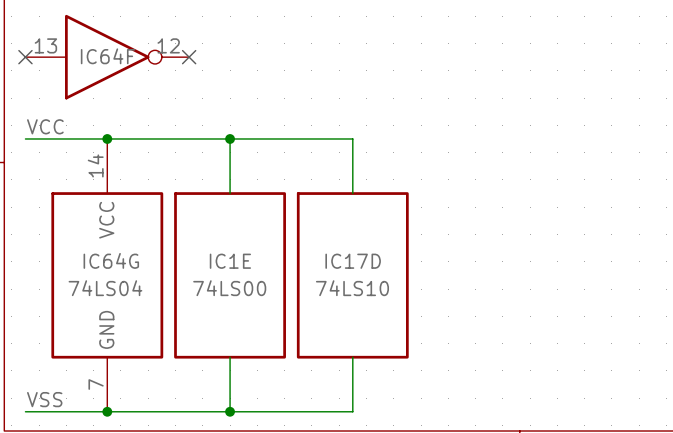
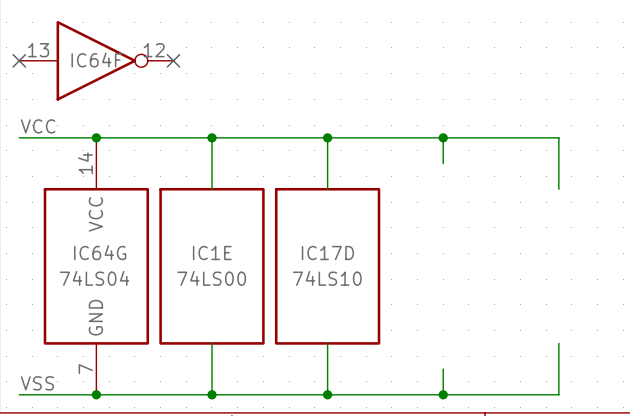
wire: none -> (327, 137) (558, 137) (558, 189)
junction: none -> (327, 137)
wire: none -> (443, 137) (443, 163)
junction: none -> (443, 137)
wire: none -> (558, 343) (558, 394) (327, 394)
wire: none -> (443, 369) (443, 394)
junction: none -> (327, 394)
junction: none -> (443, 394)

